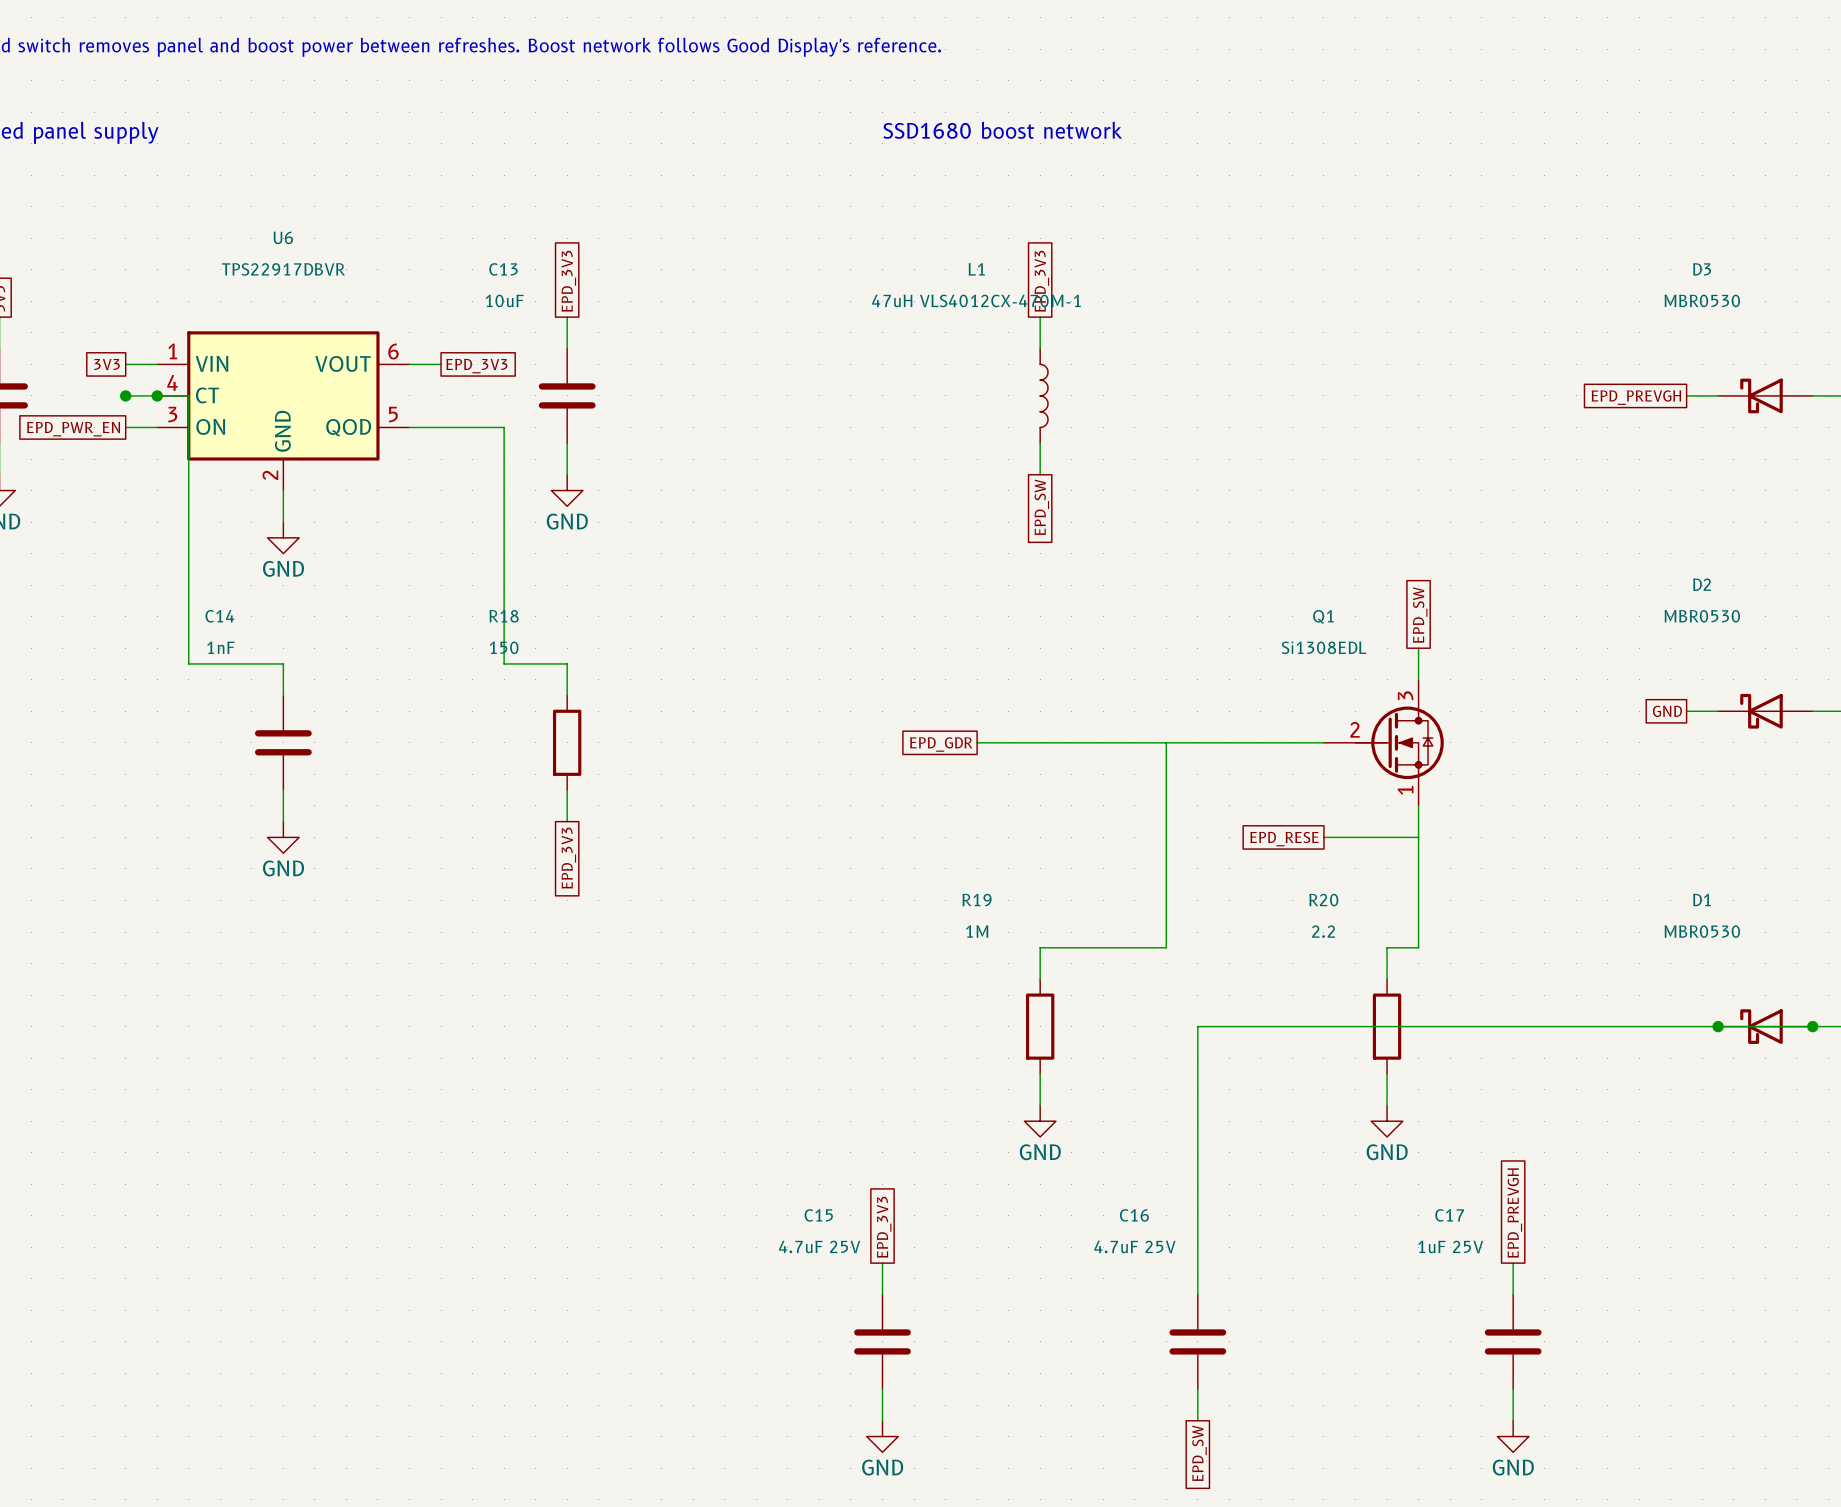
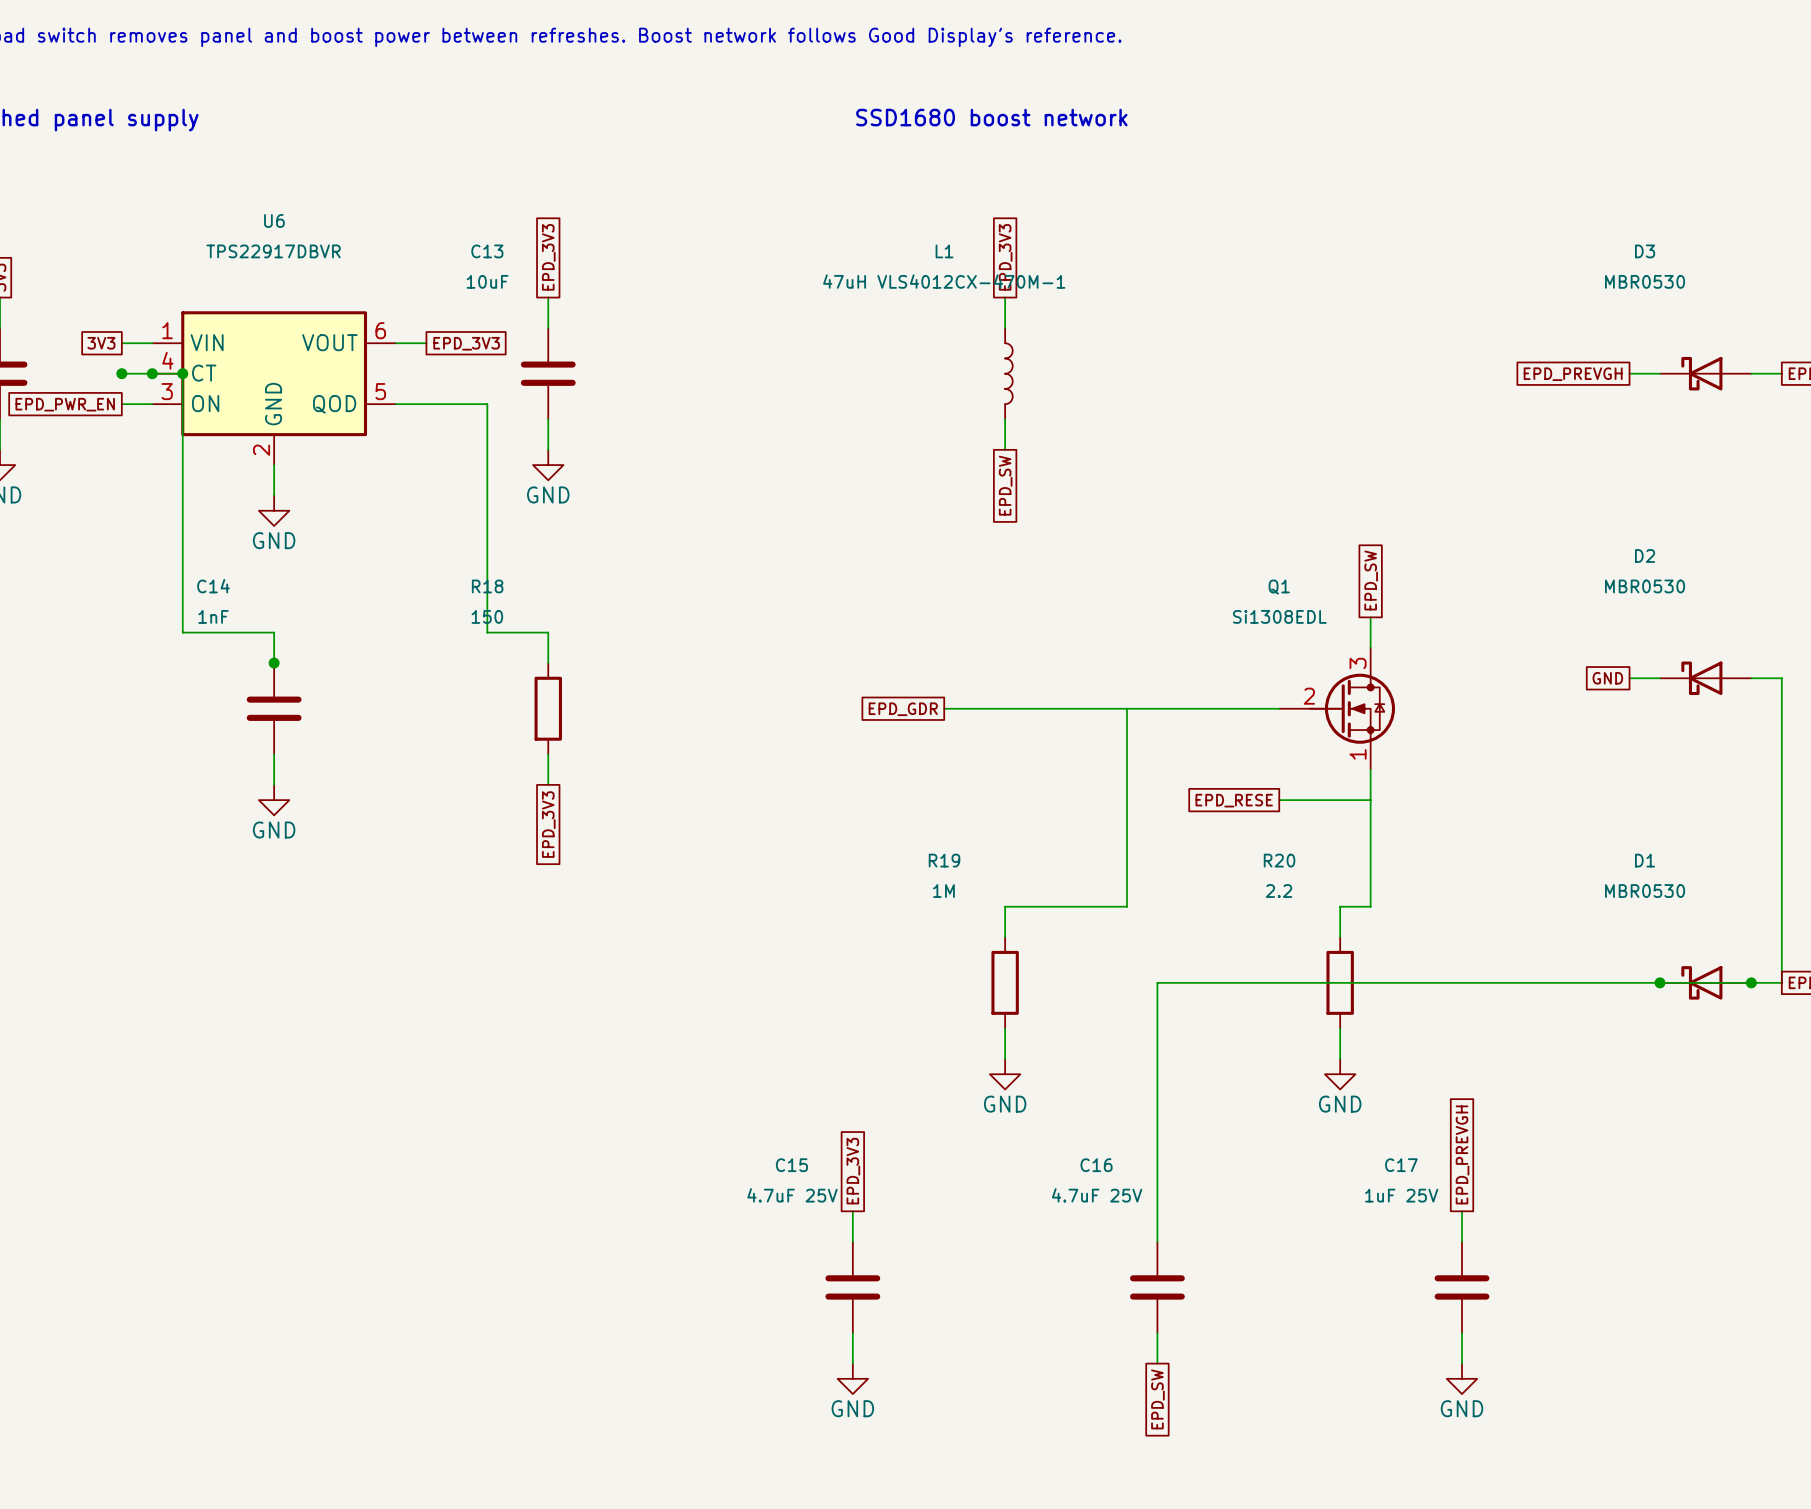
junction: none -> (182, 373)
junction: none -> (274, 663)

